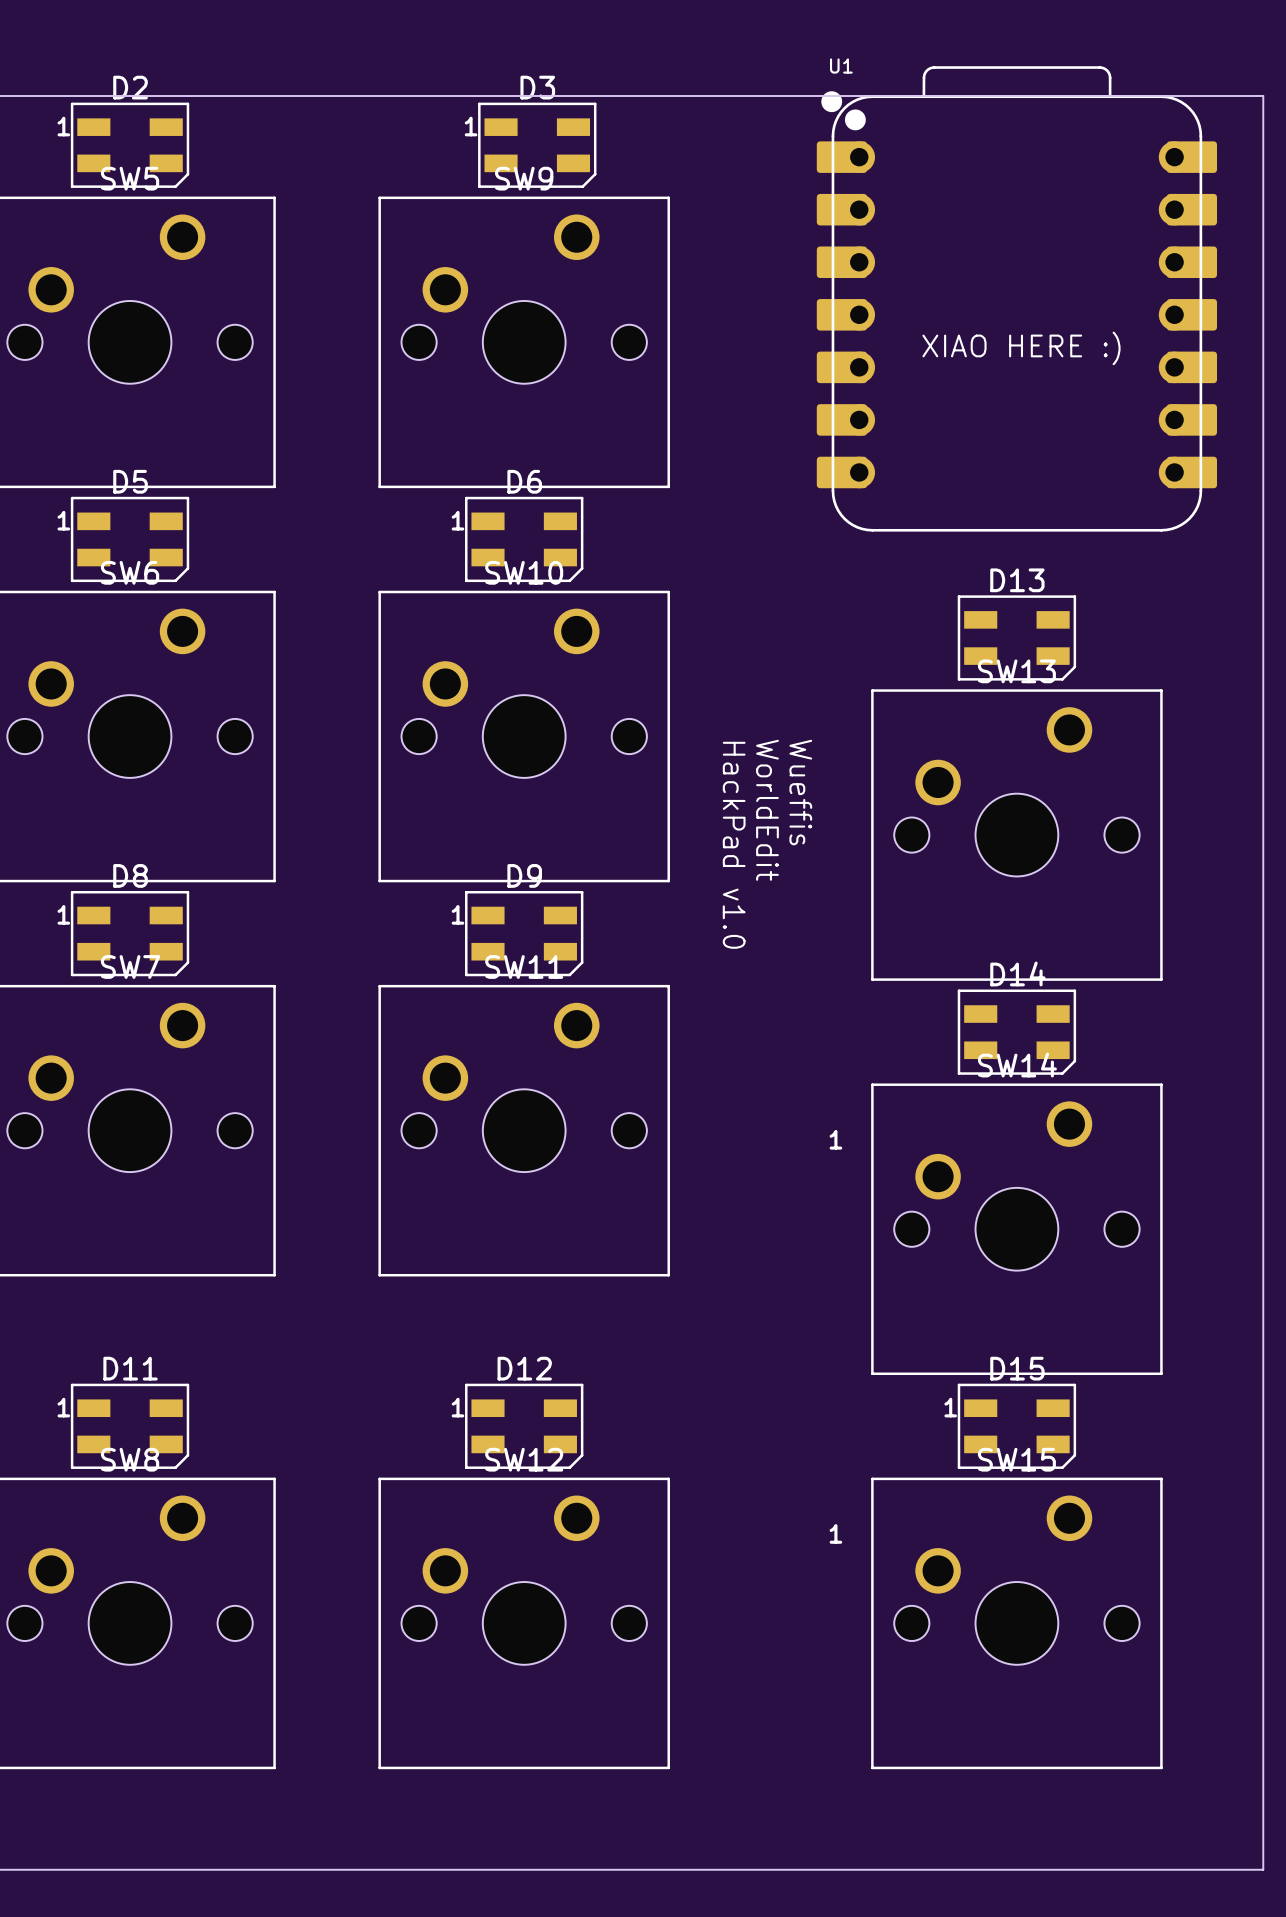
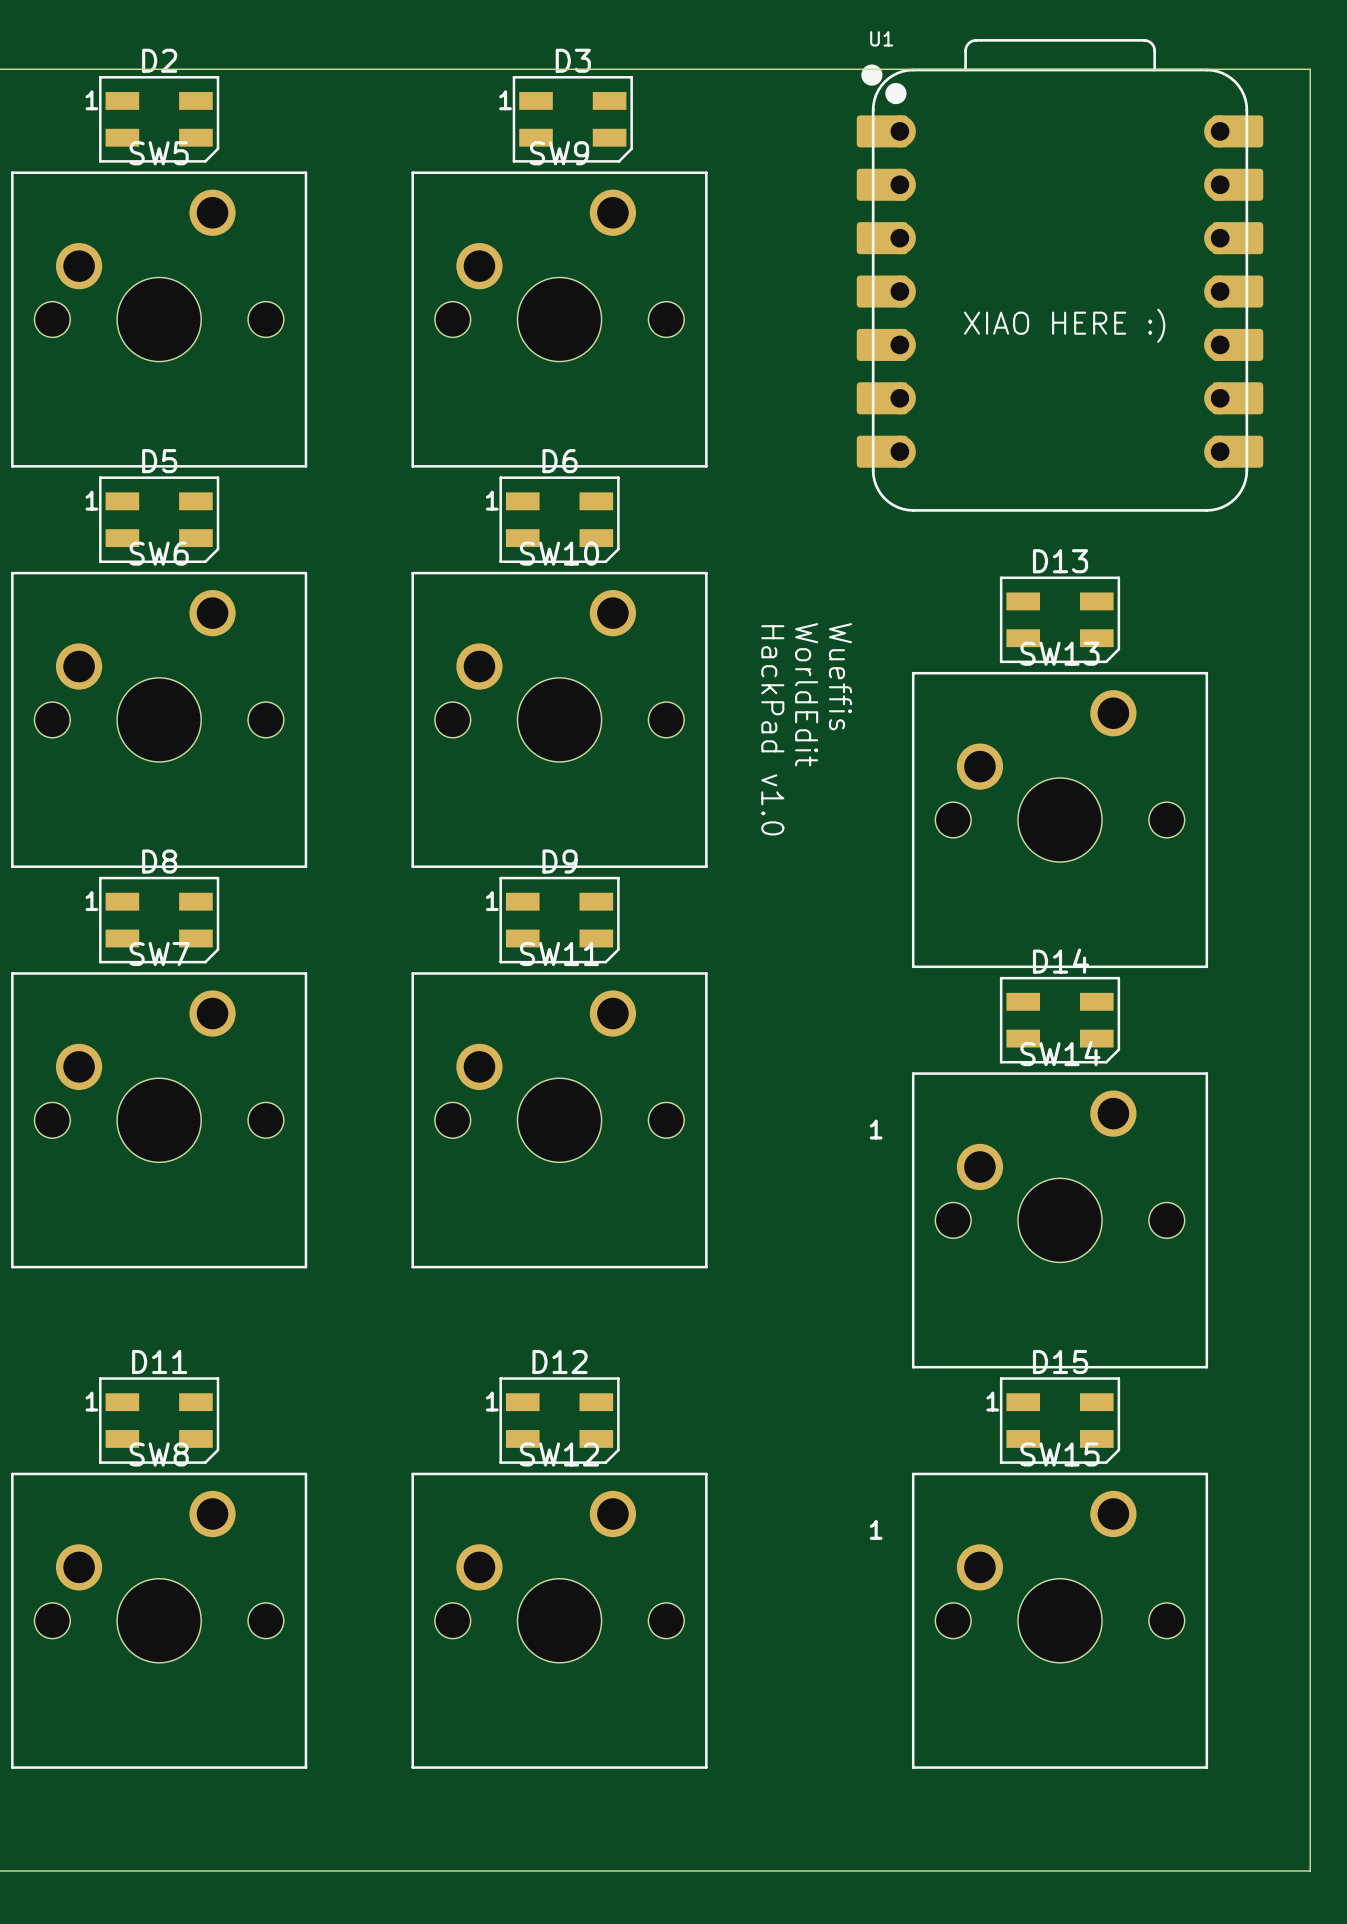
text position: Wueffis (800, 792) -> Wueffis (840, 676)
text position: WorldEdit (767, 810) -> WorldEdit (806, 694)
text position: HackPad v1.0 (734, 845) -> HackPad v1.0 (772, 730)

